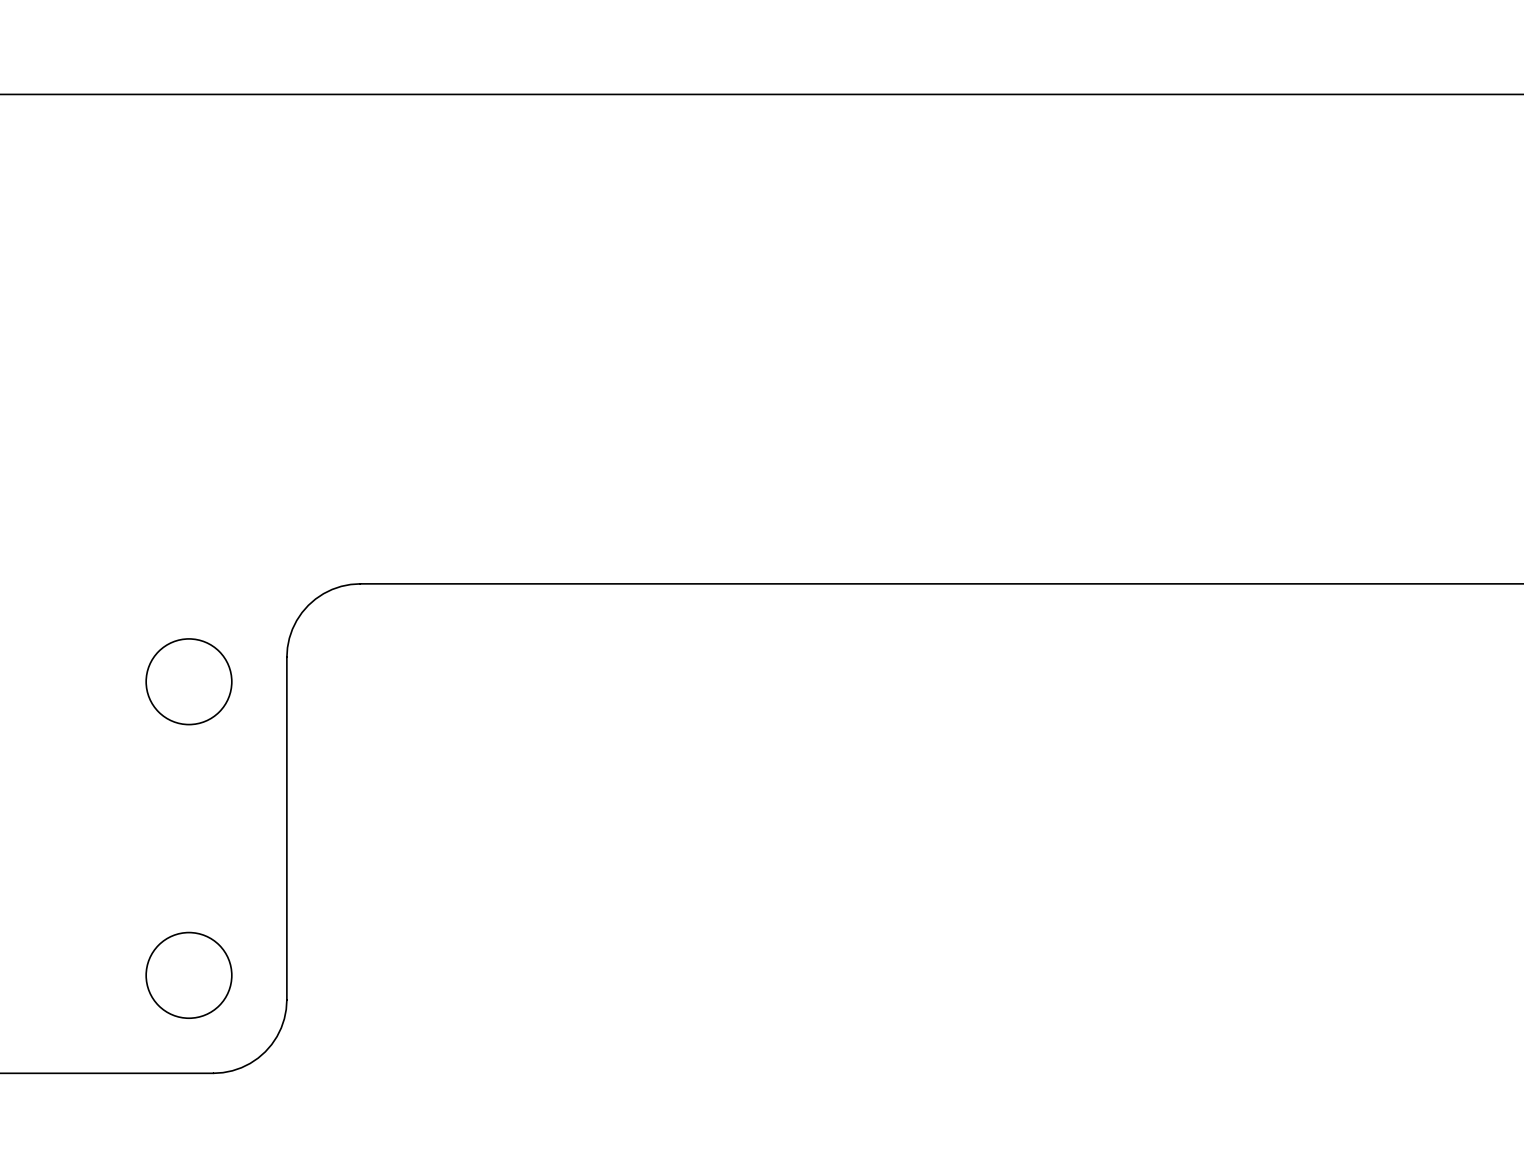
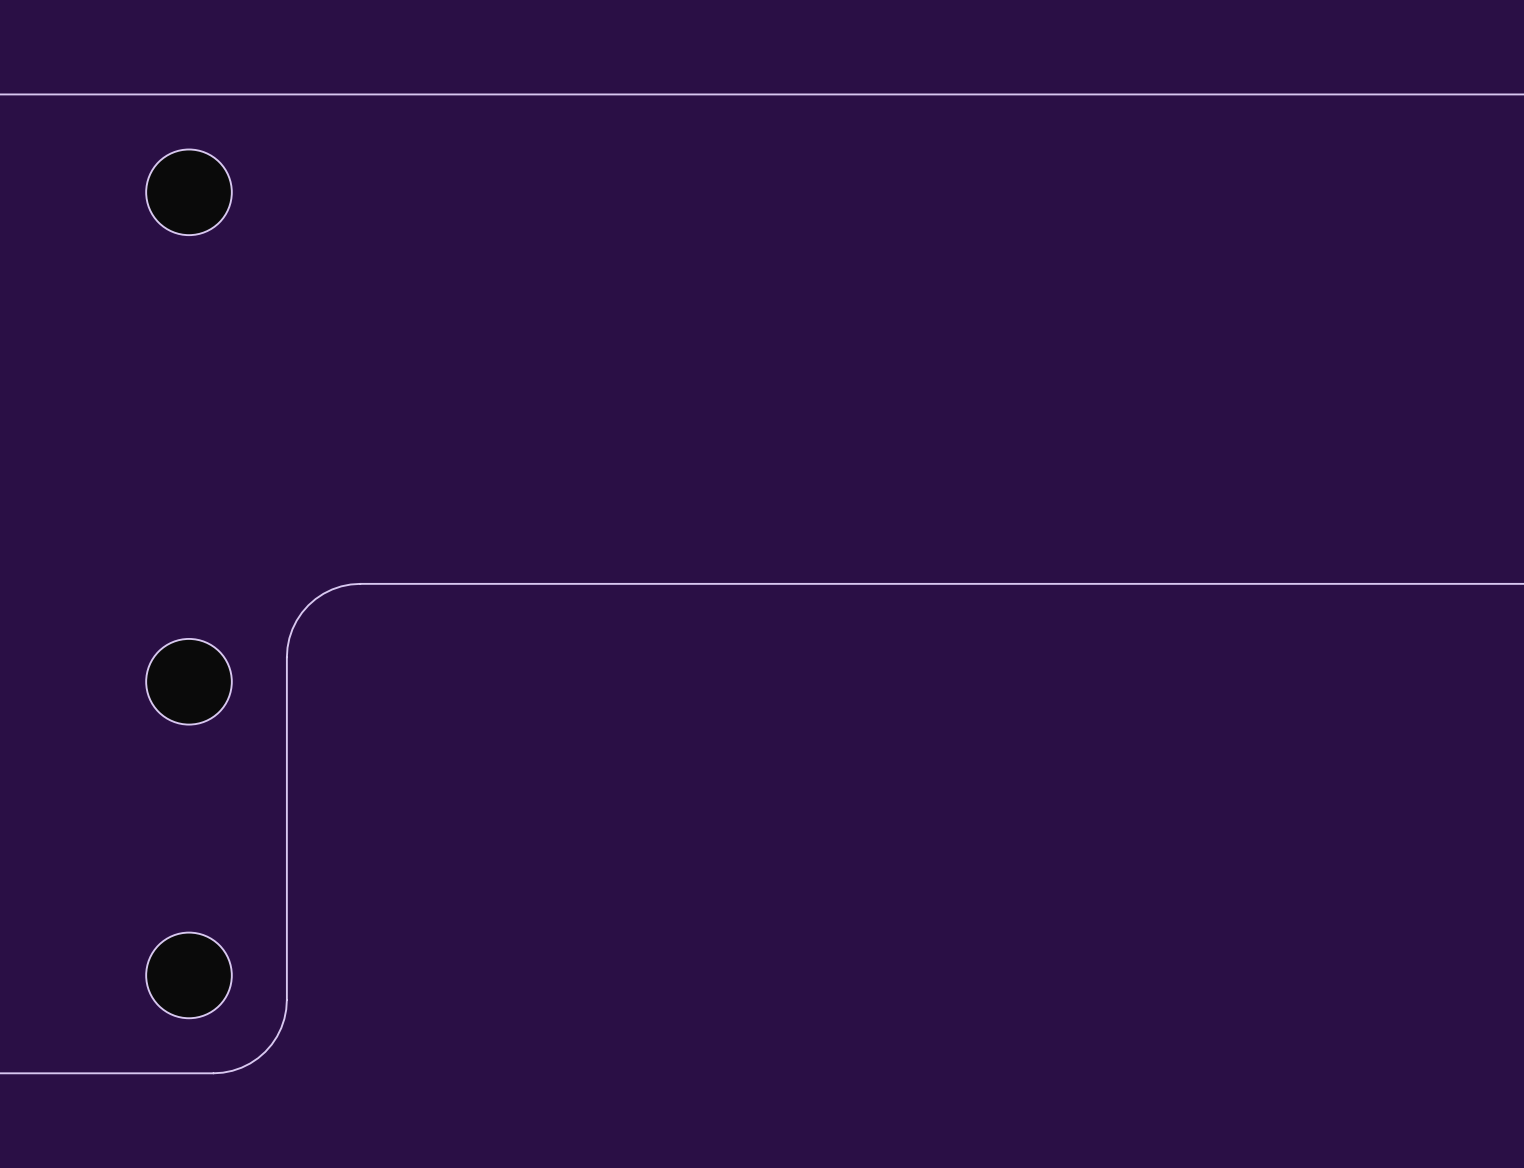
part: none -> (188, 192)

